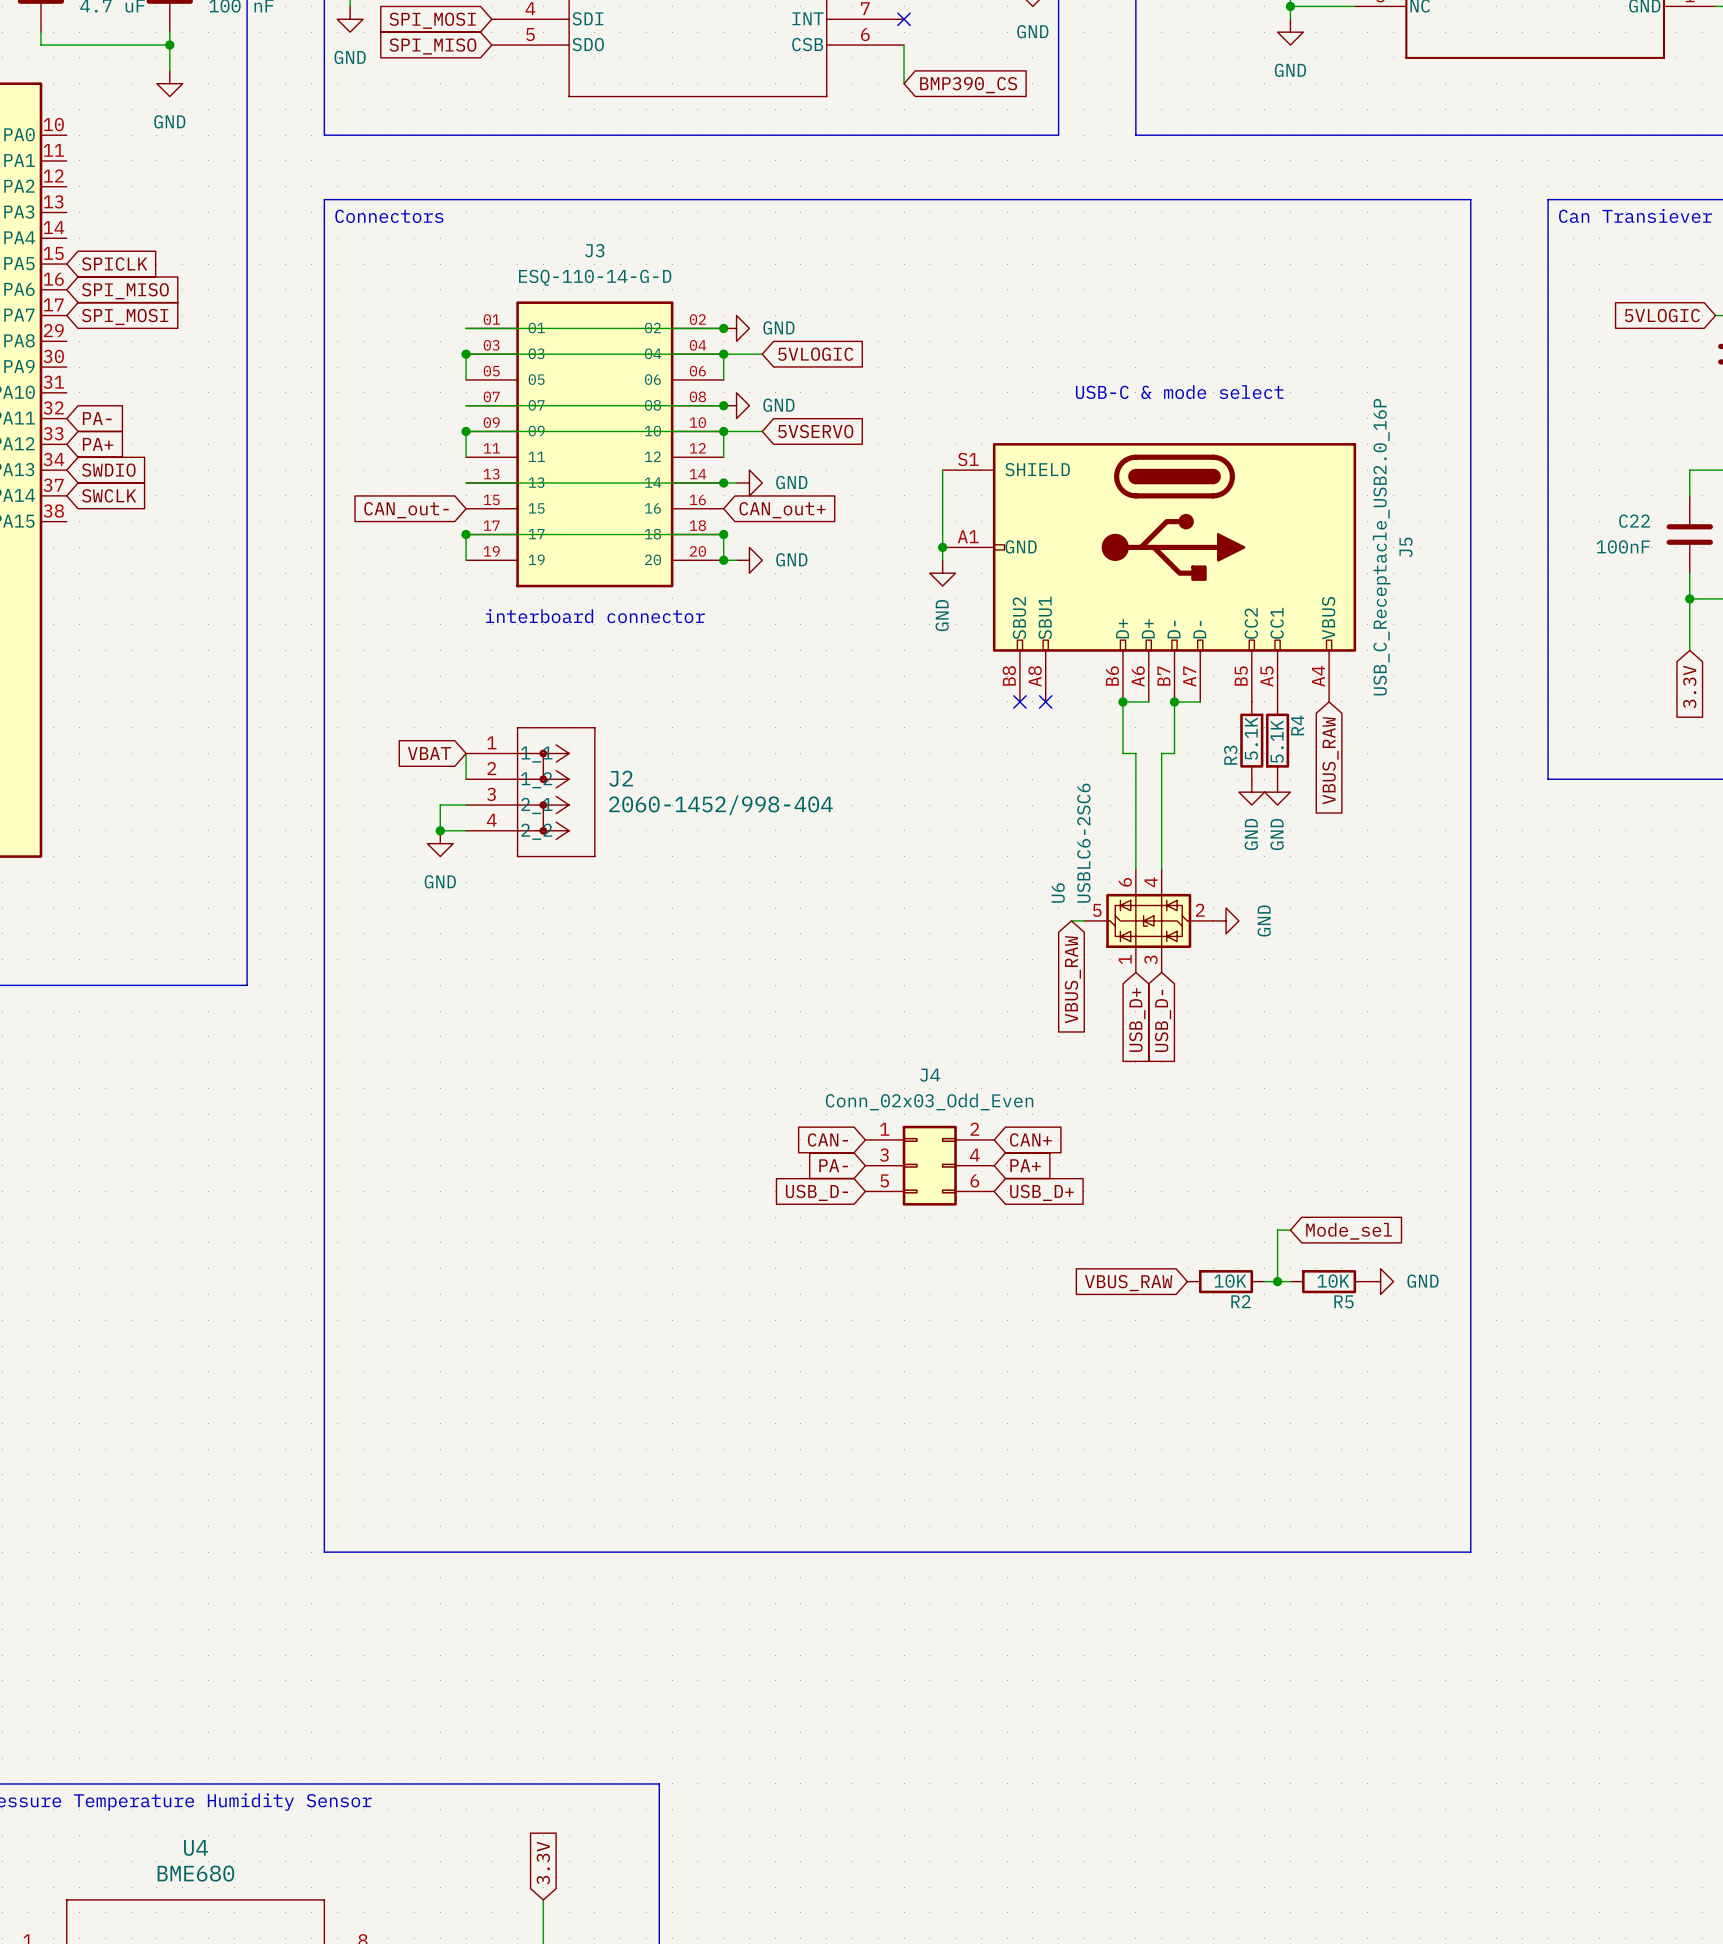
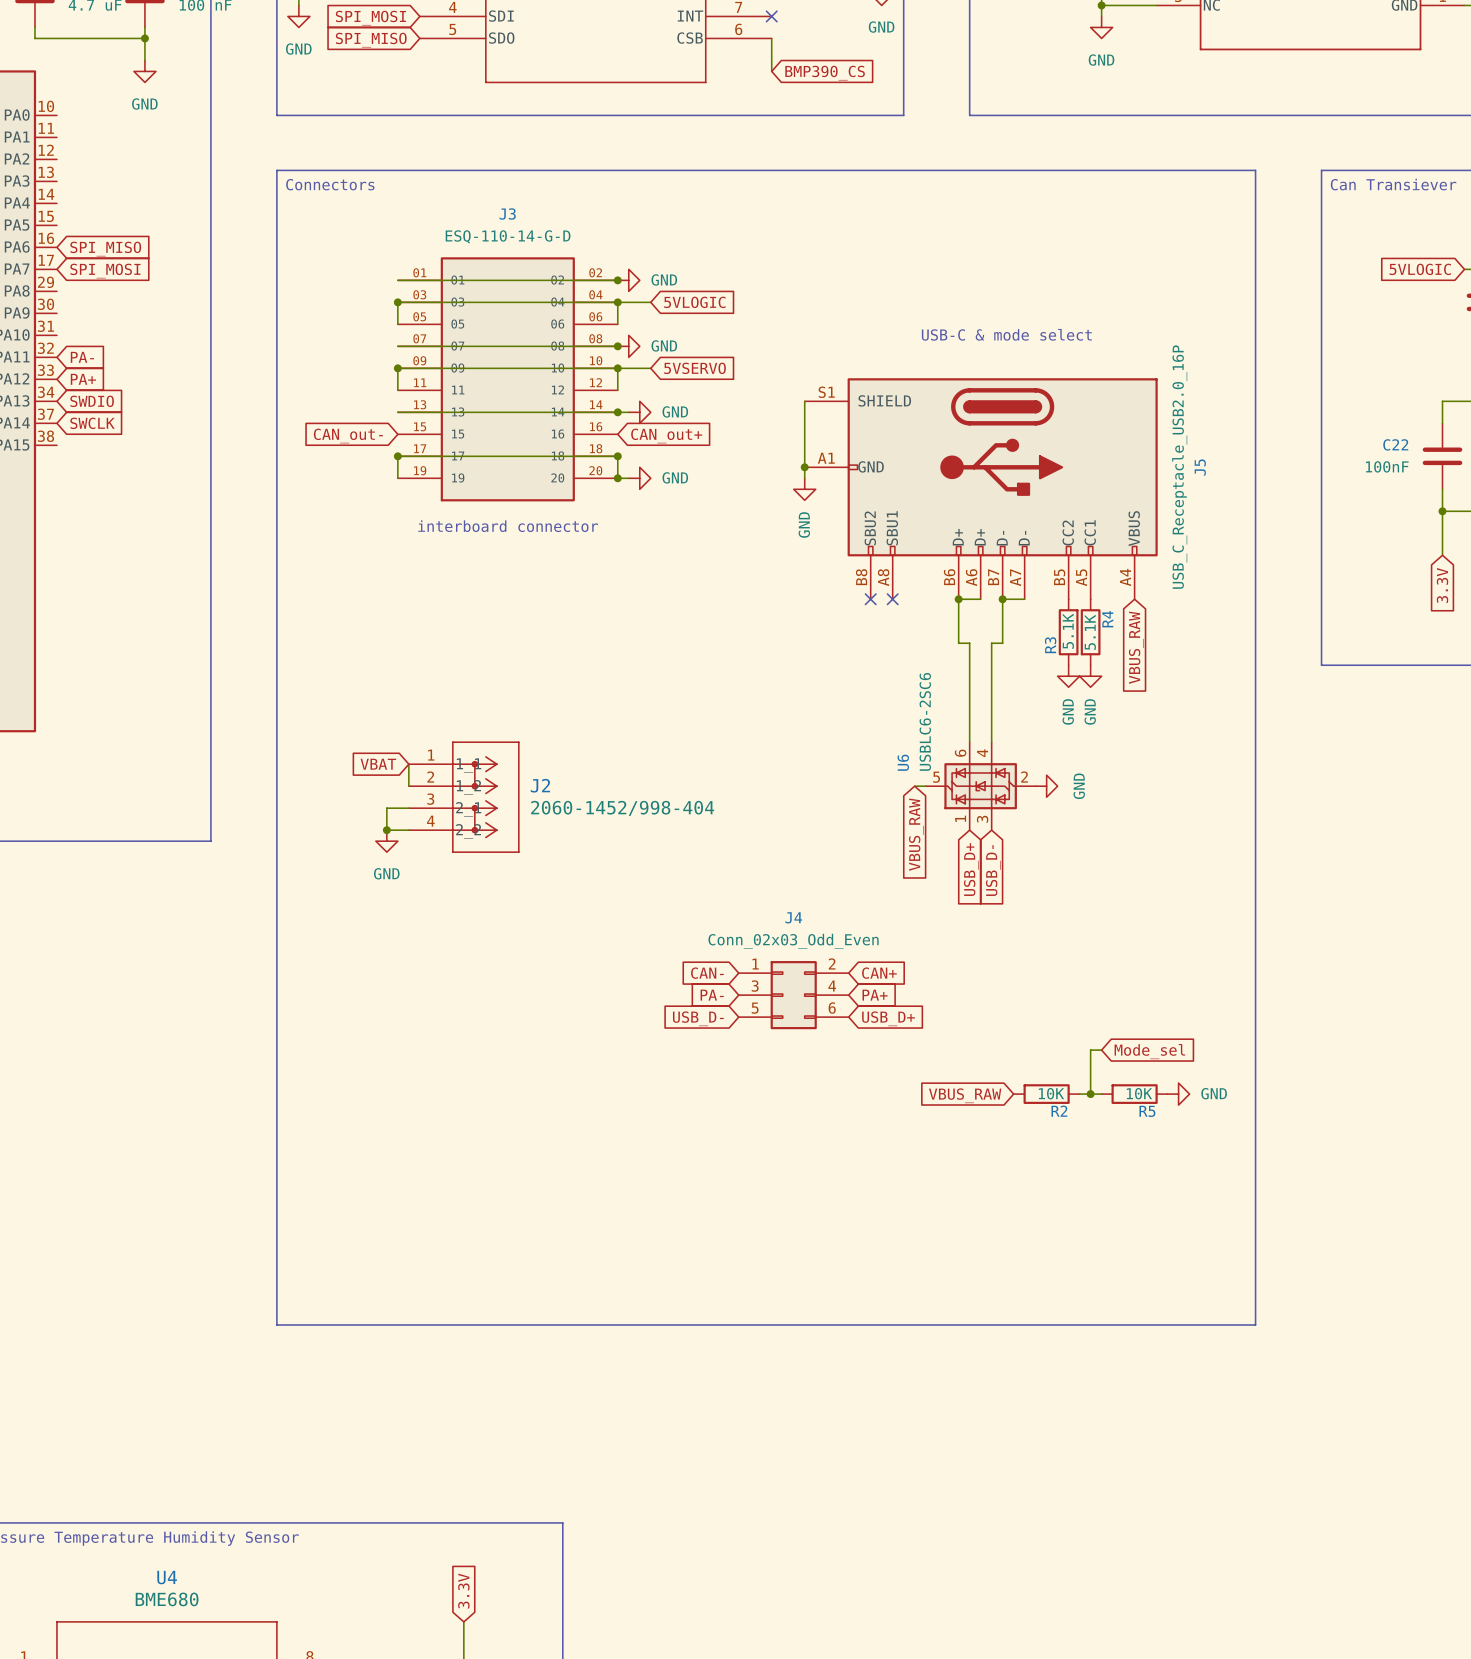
global label: SPICLK (114, 264) -> none
global label position: VBAT (429, 753) -> VBAT (378, 764)
wire: (466, 753) (466, 779) -> (408, 764) (408, 786)
J2 position: (530, 792) -> (464, 797)
wire: (466, 805) (440, 805) (440, 830) (466, 830) -> (408, 808) (386, 808) (386, 830) (408, 830)
junction: (440, 830) -> none
power symbol position: GND (440, 843) -> GND (386, 841)
junction: none -> (386, 830)

